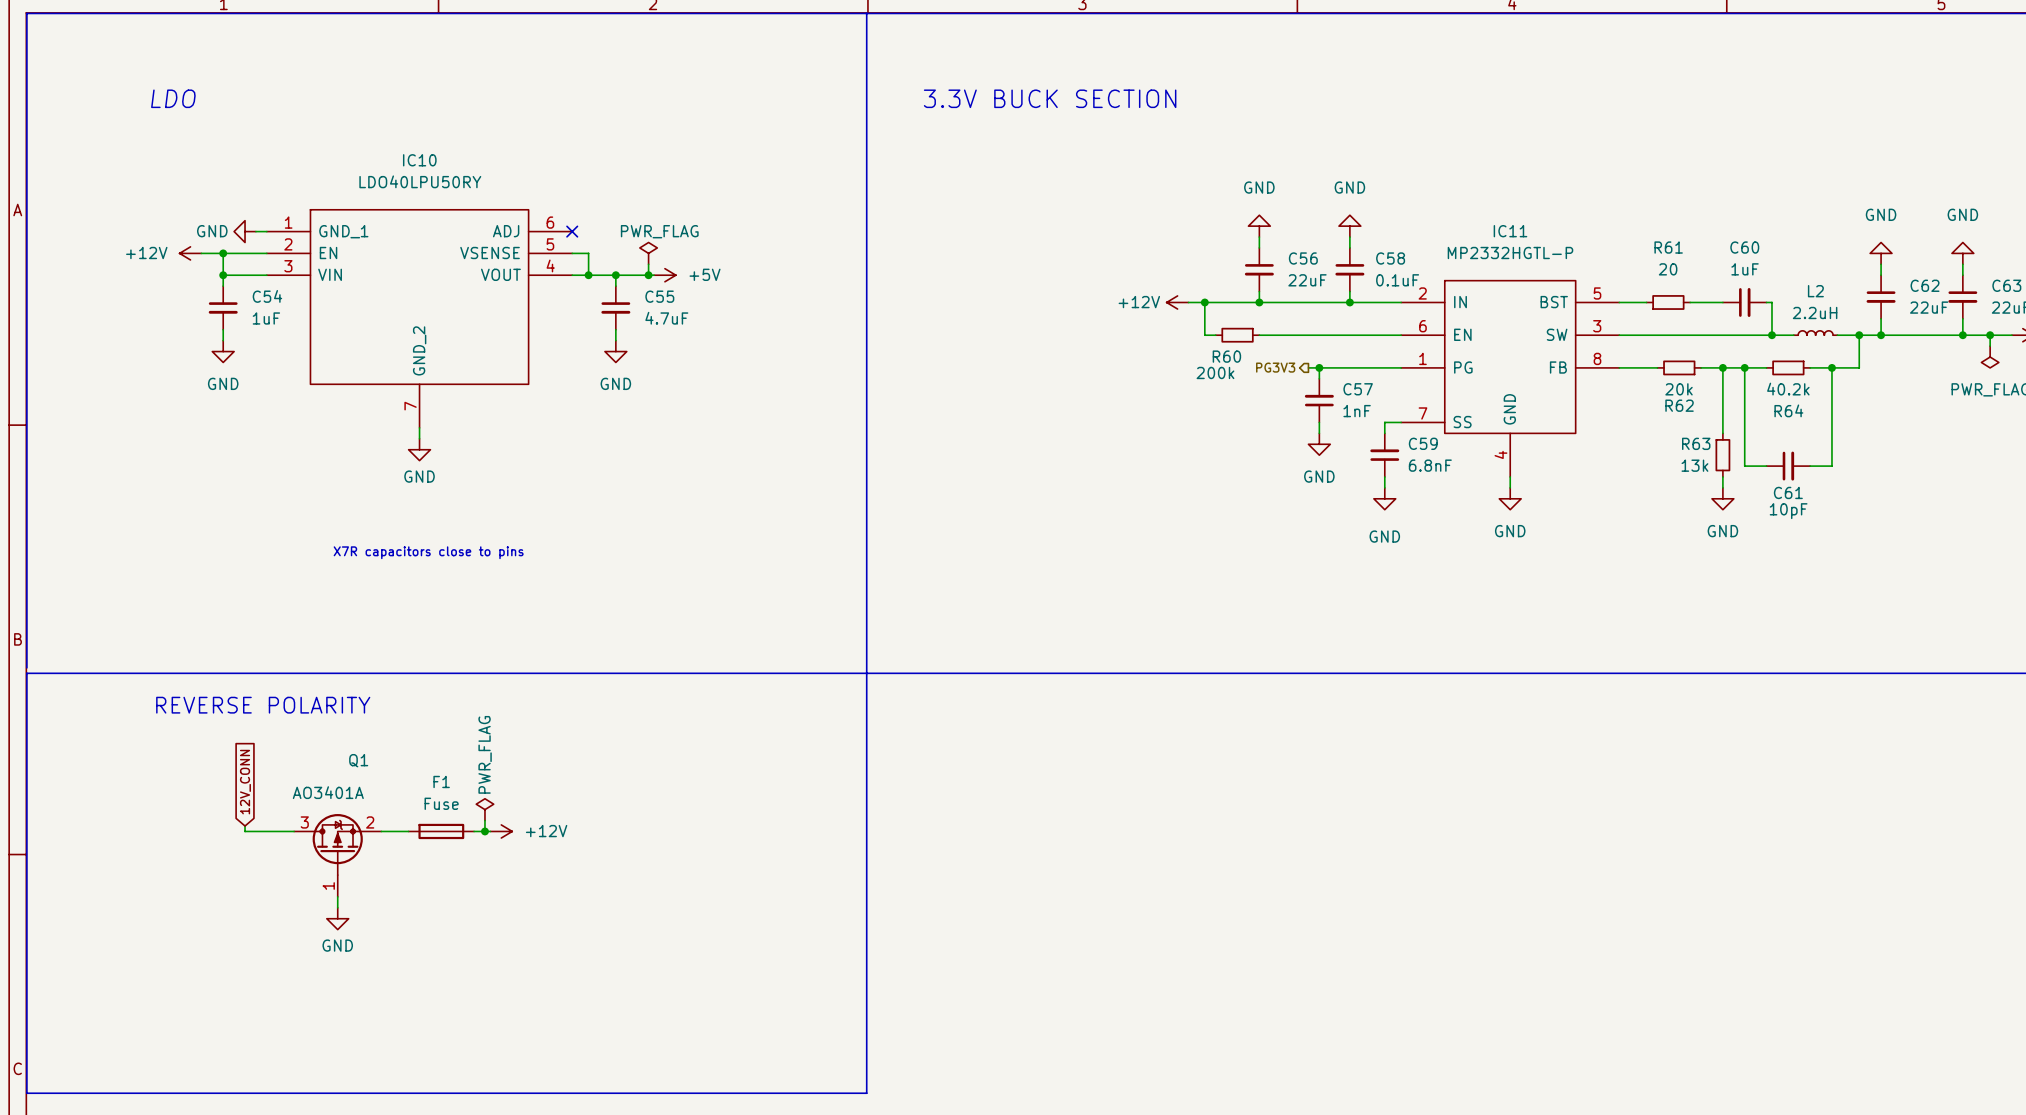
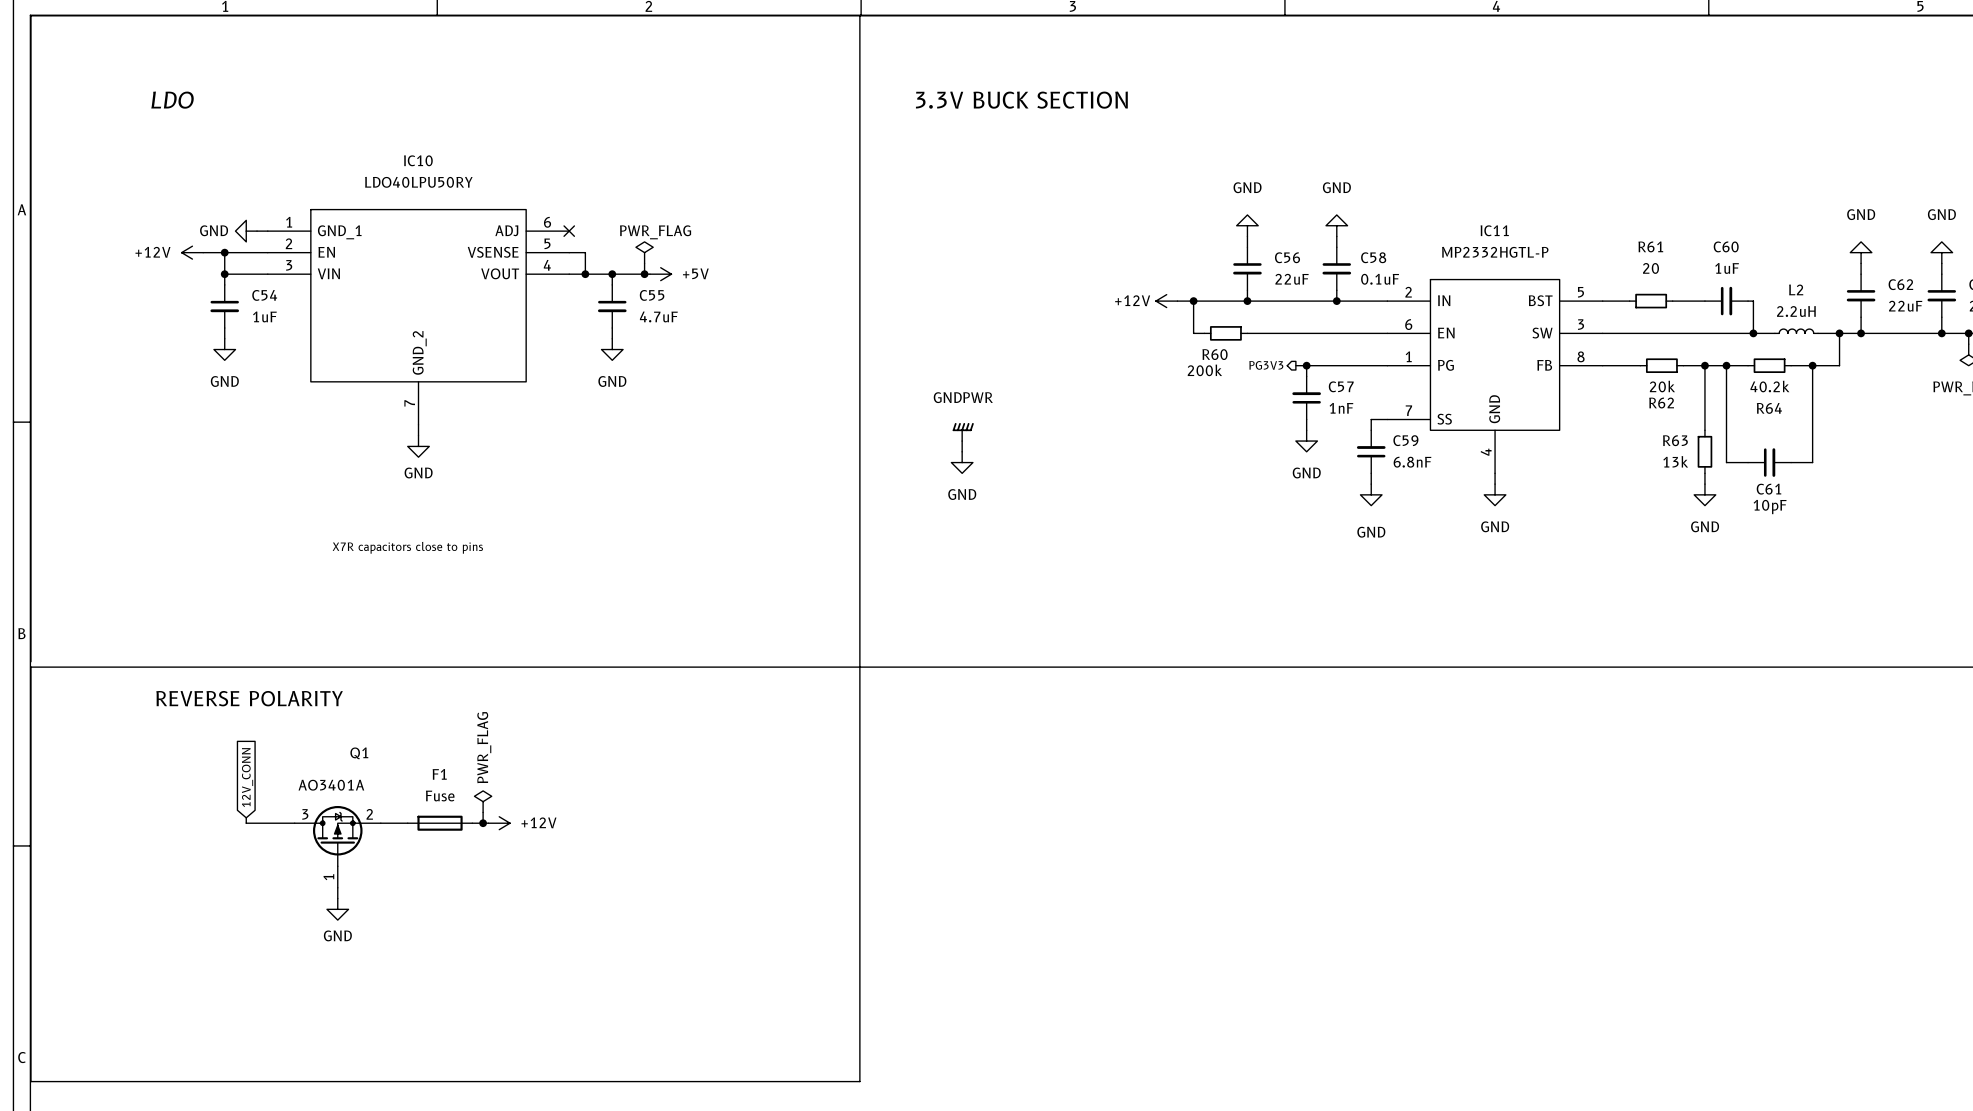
power symbol: none -> GNDPWR (963, 432)
wire: none -> (962, 441) (962, 451)
power symbol: none -> GND (962, 462)

